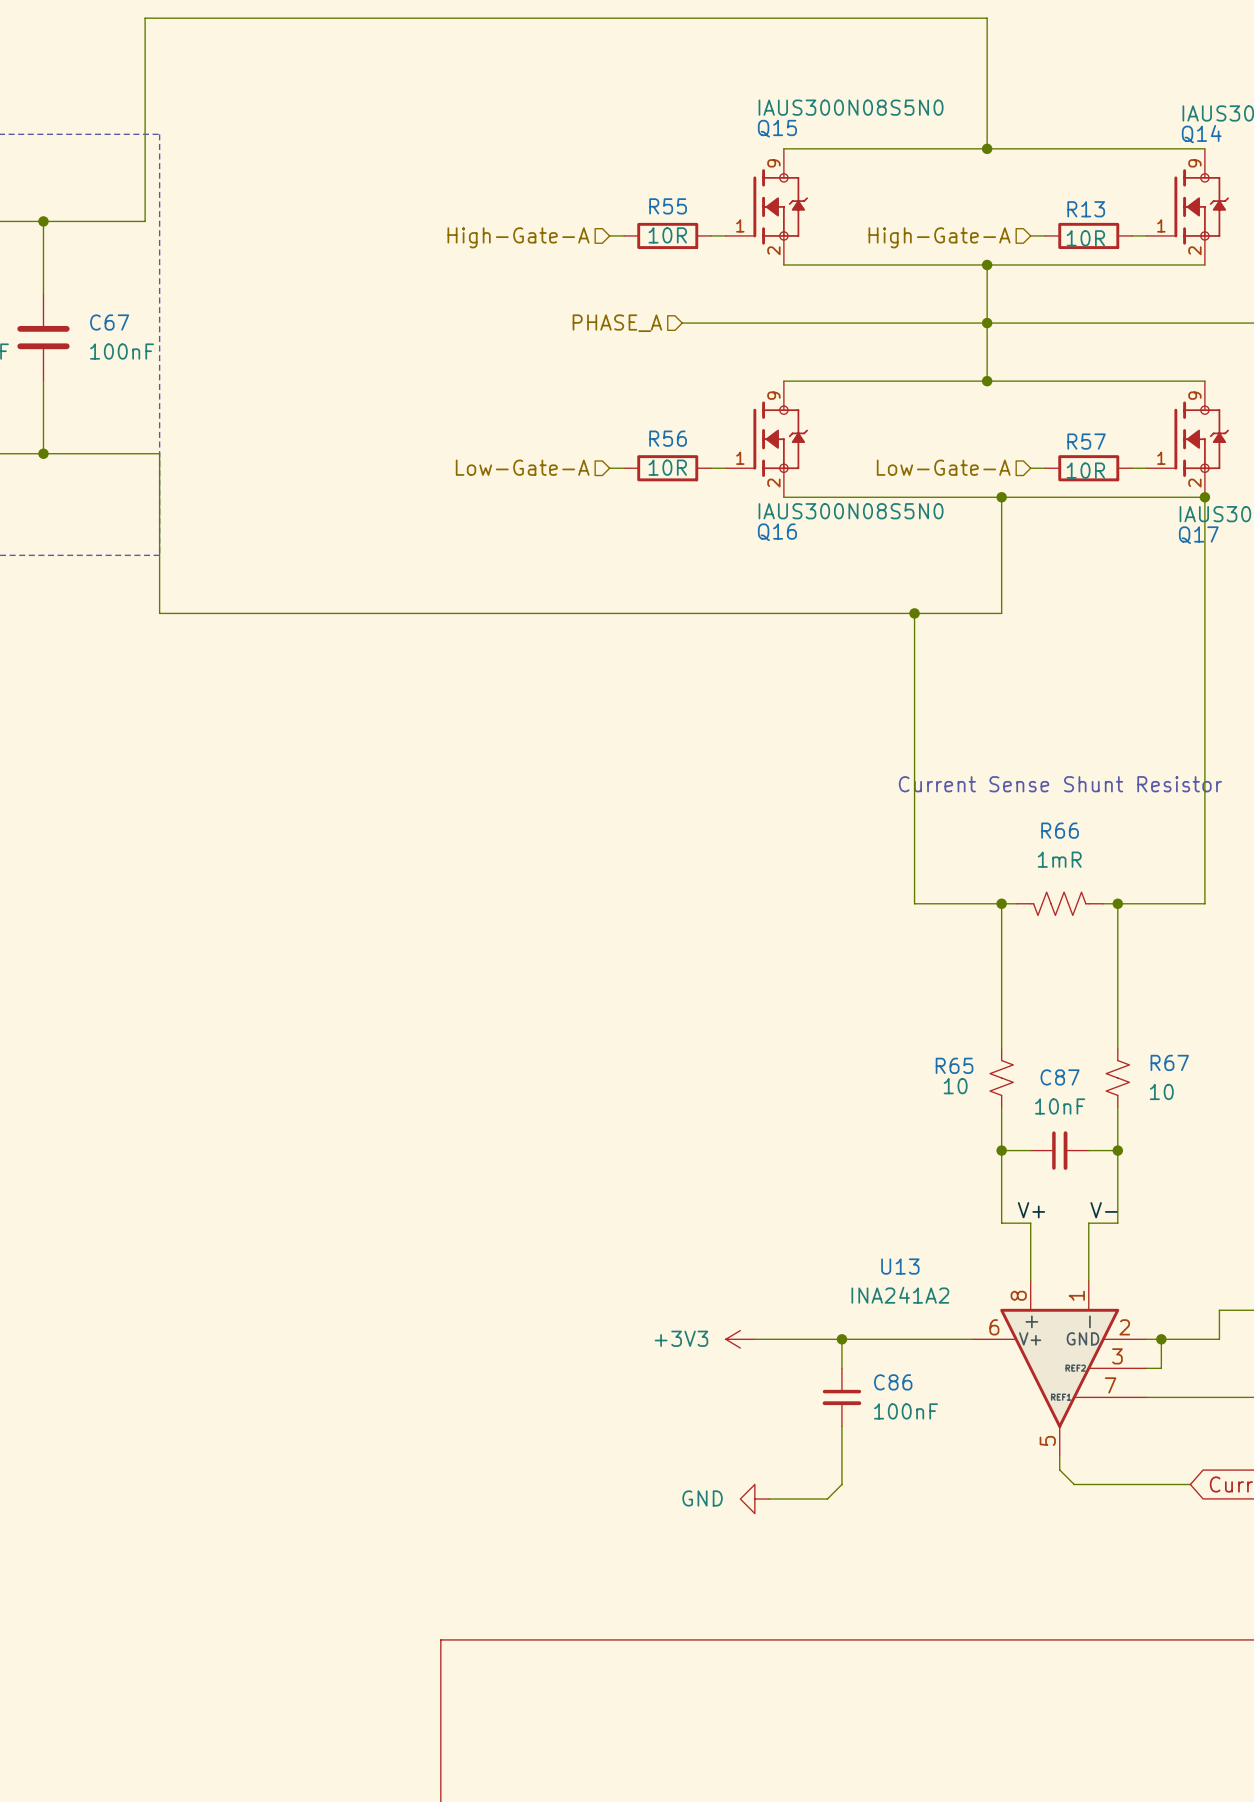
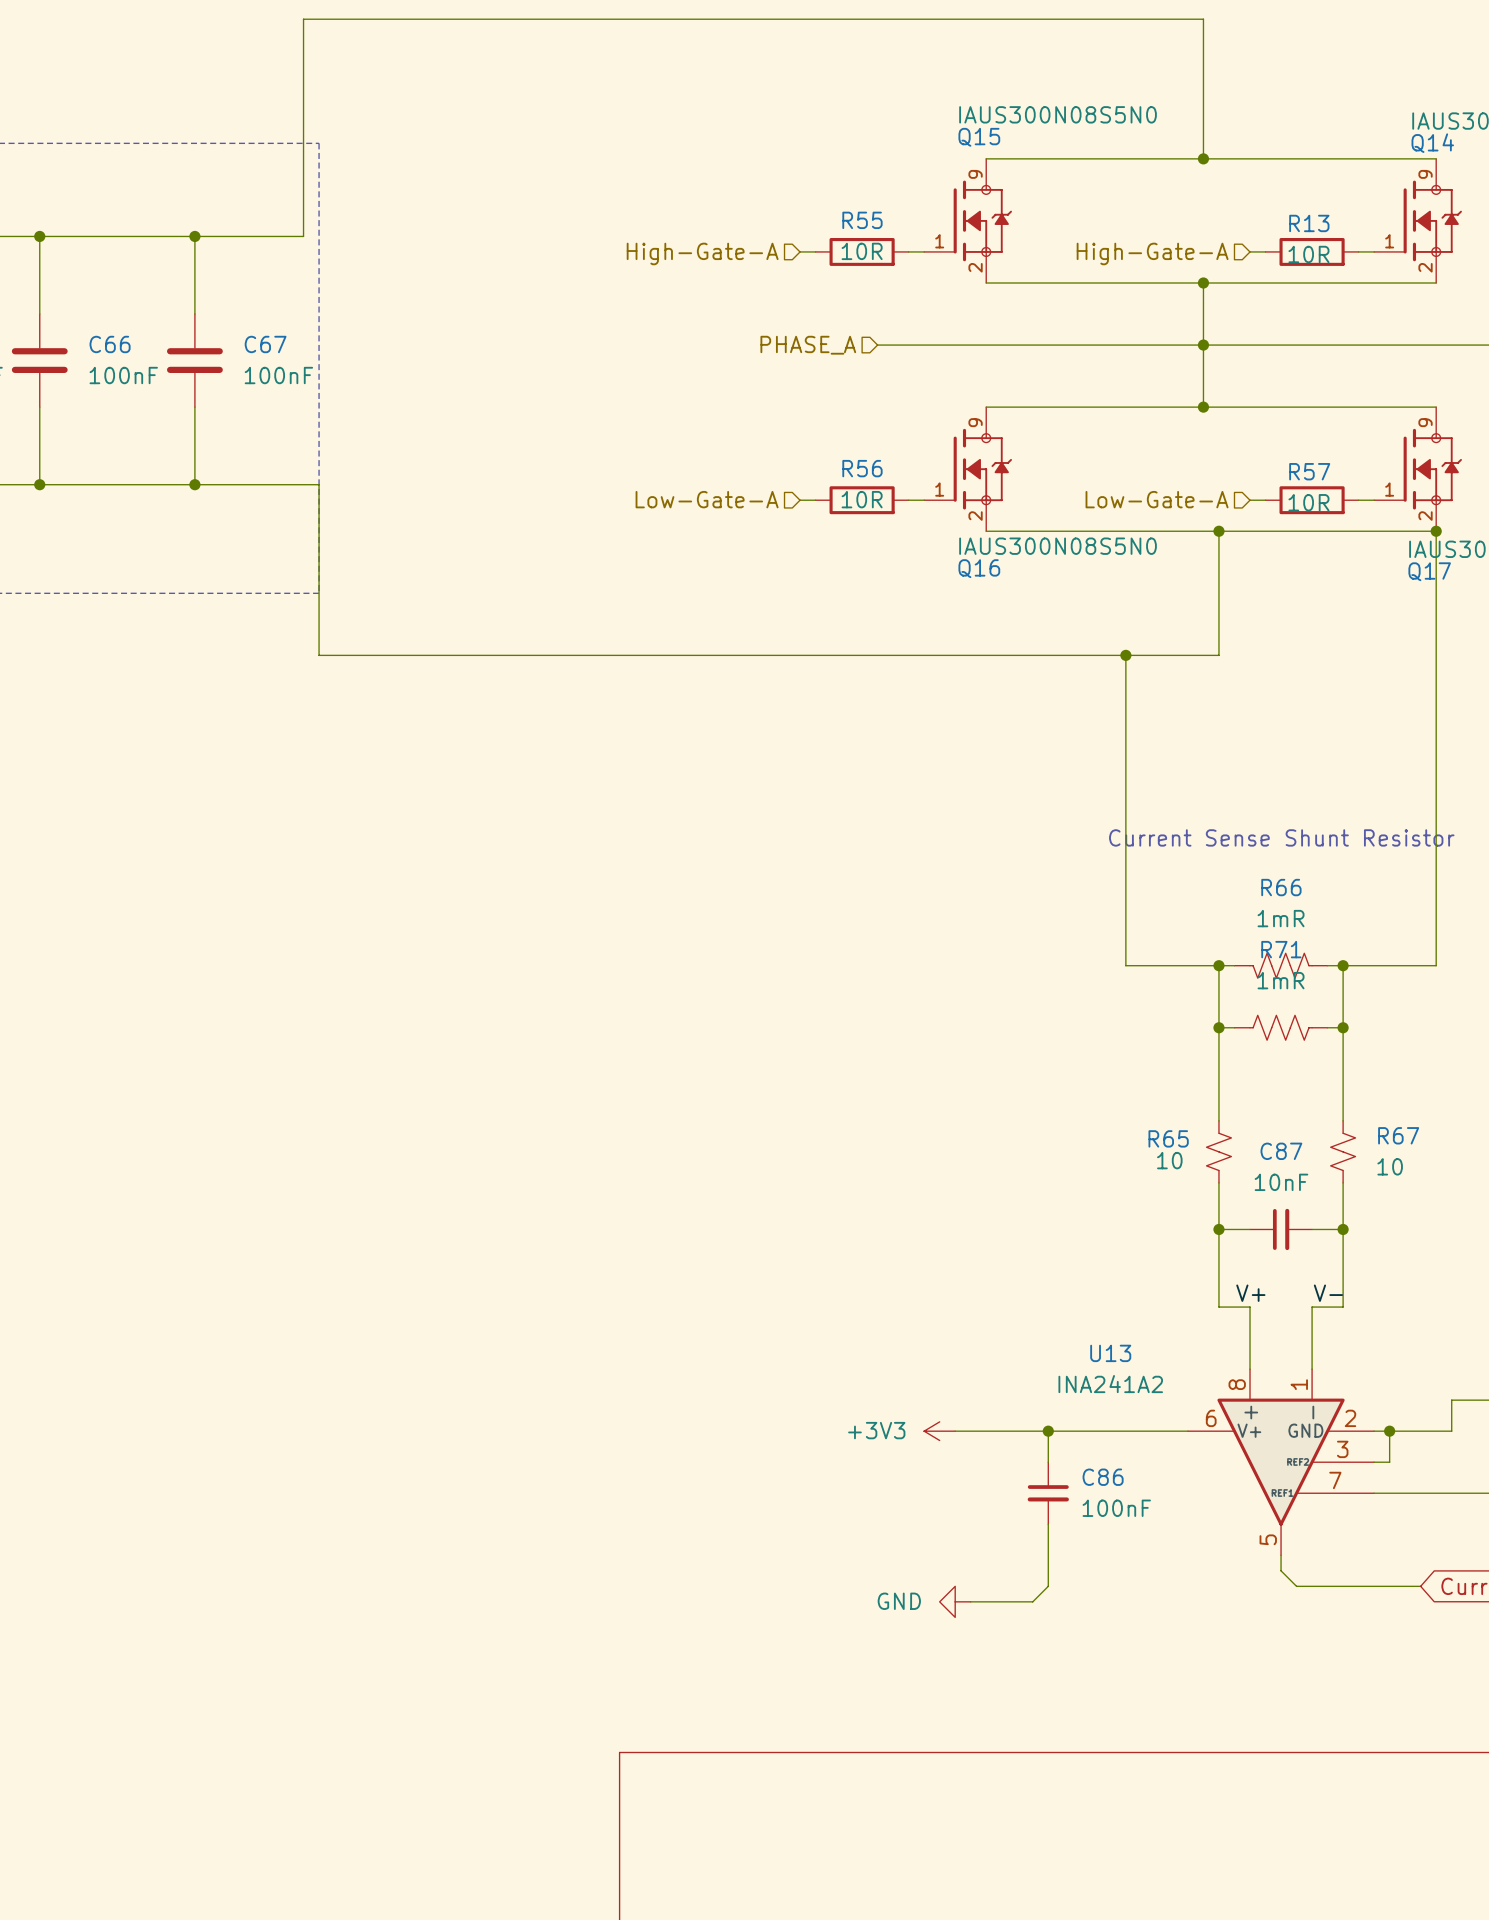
wire: none -> (1218, 1027) (1234, 1027)
junction: none -> (1218, 1027)
R71: none -> 1mR (1281, 1027)
wire: none -> (1327, 1027) (1343, 1027)
junction: none -> (1343, 1027)

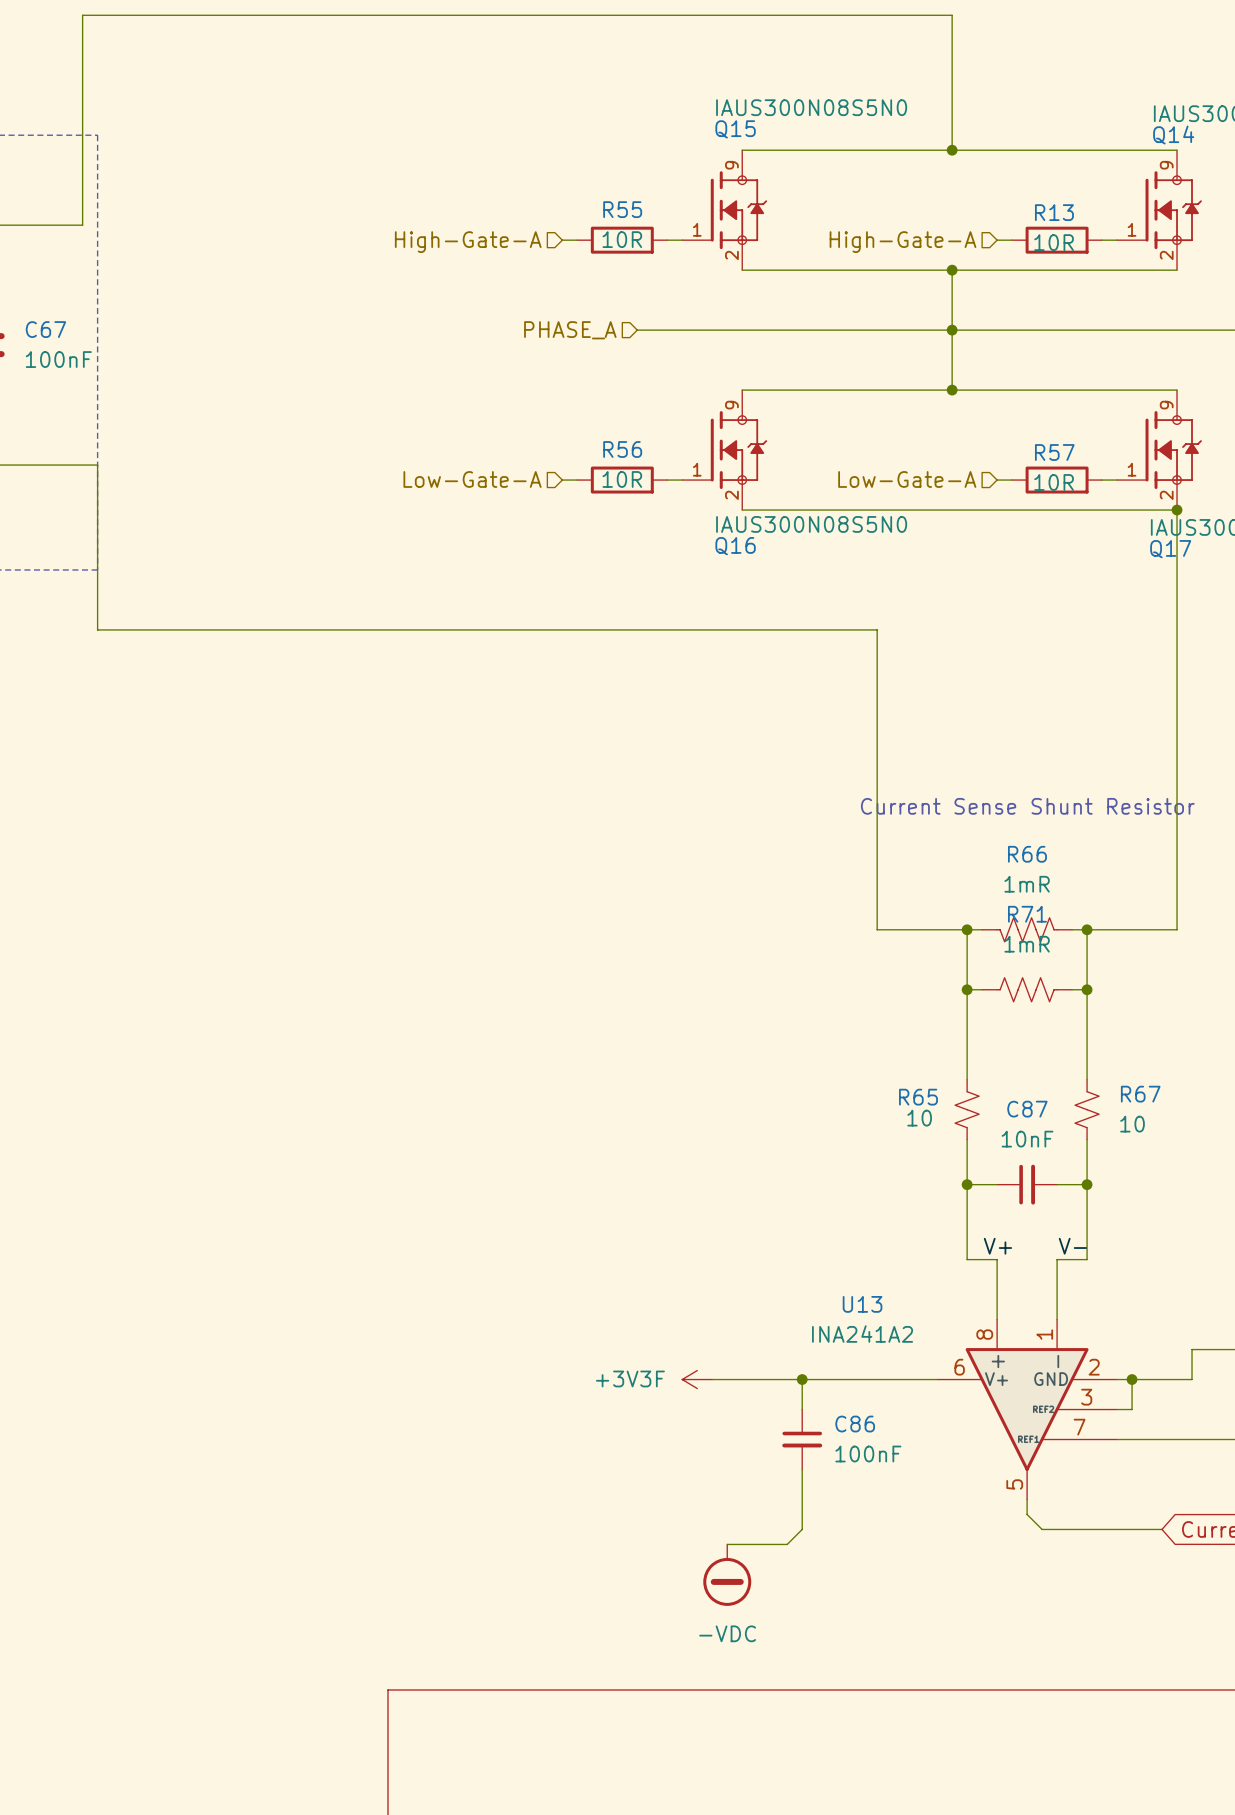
wire: (1218, 531) (1218, 655) (1125, 655) -> none
junction: (1218, 531) -> none
junction: (1125, 655) -> none
power symbol: +3V3 (939, 1431) -> +3V3F (697, 1379)
power symbol: GND (955, 1601) -> none
power symbol: none -> -VDC (727, 1575)

